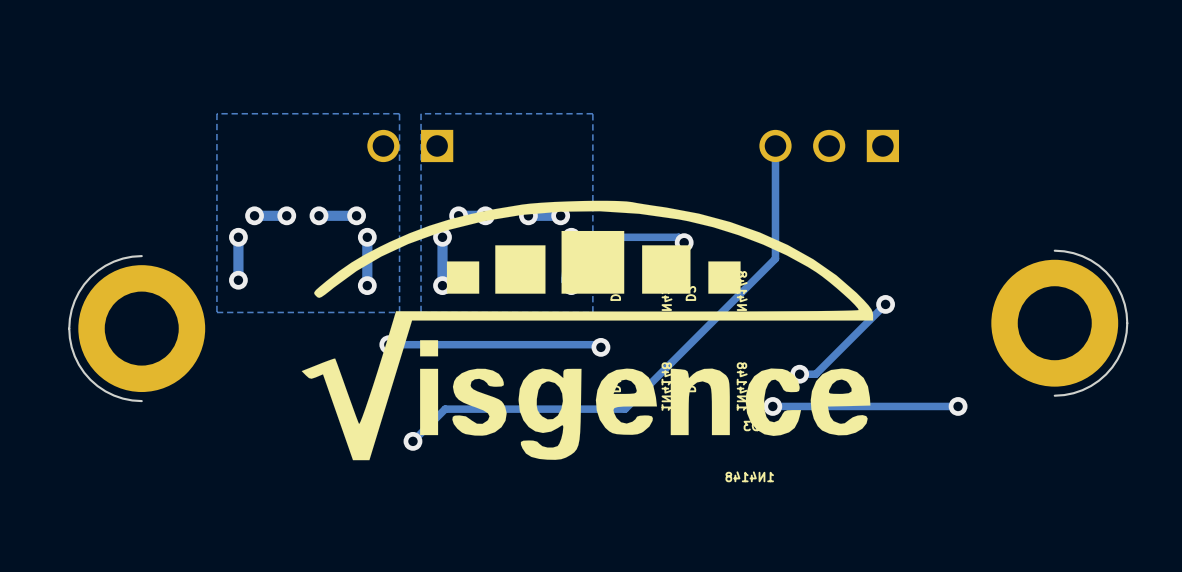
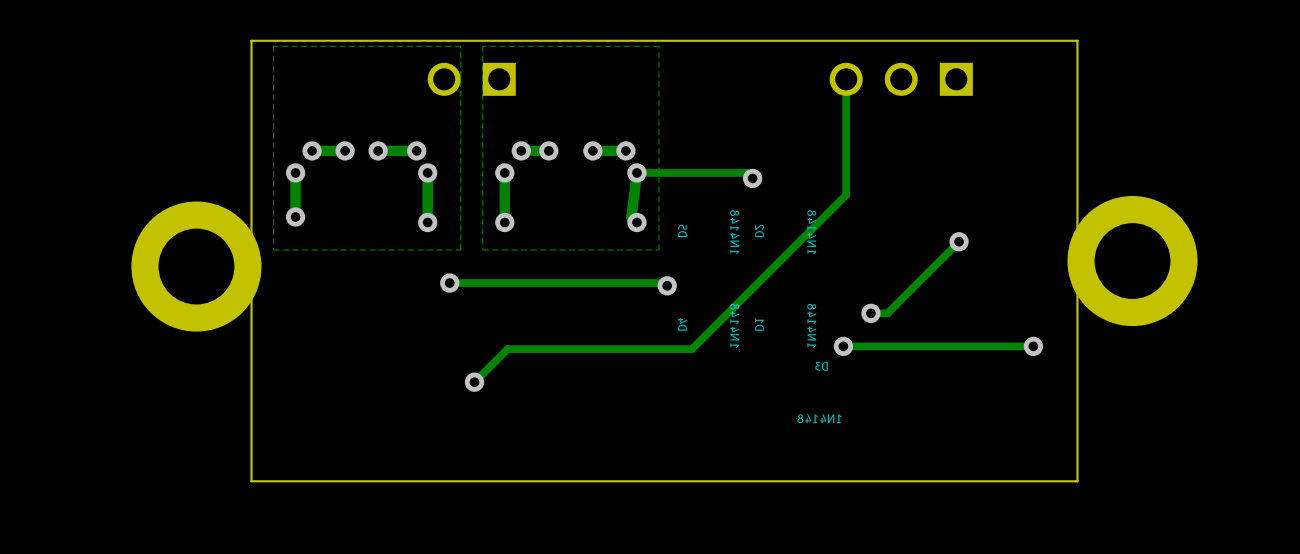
board edge: none -> (1077, 40) (1077, 481) (251, 481) (251, 40) (1077, 40)
drawing: [301, 200, 874, 461] -> none
board edge: (1054, 250) (1082, 256) (1106, 271) (1121, 295) (1127, 323) (1121, 350) (1106, 374) (1082, 390) (1054, 395) -> none
board edge: (141, 256) (114, 261) (90, 277) (74, 300) (69, 328) (74, 356) (90, 379) (114, 395) (141, 401) -> none

